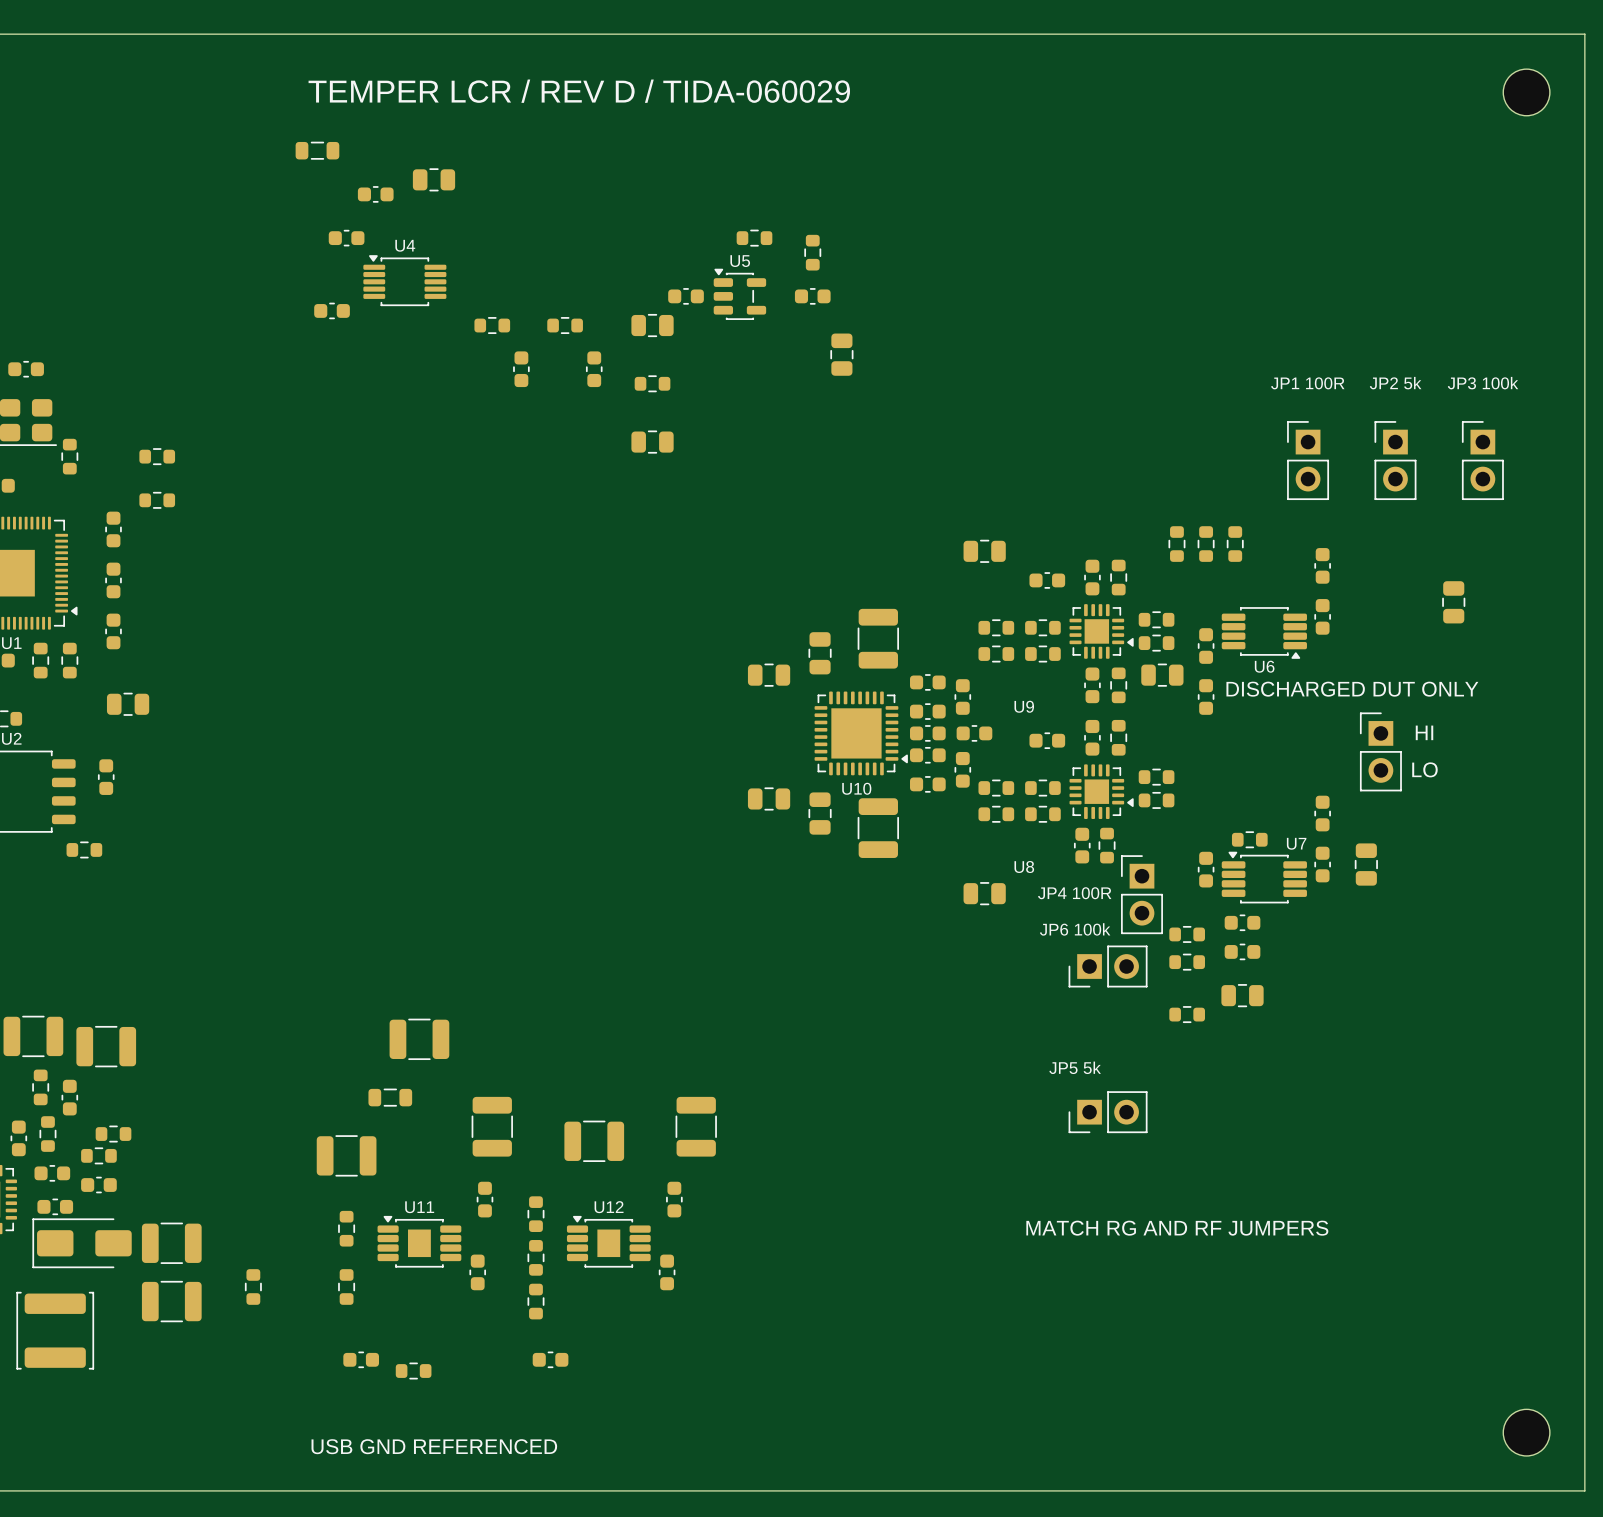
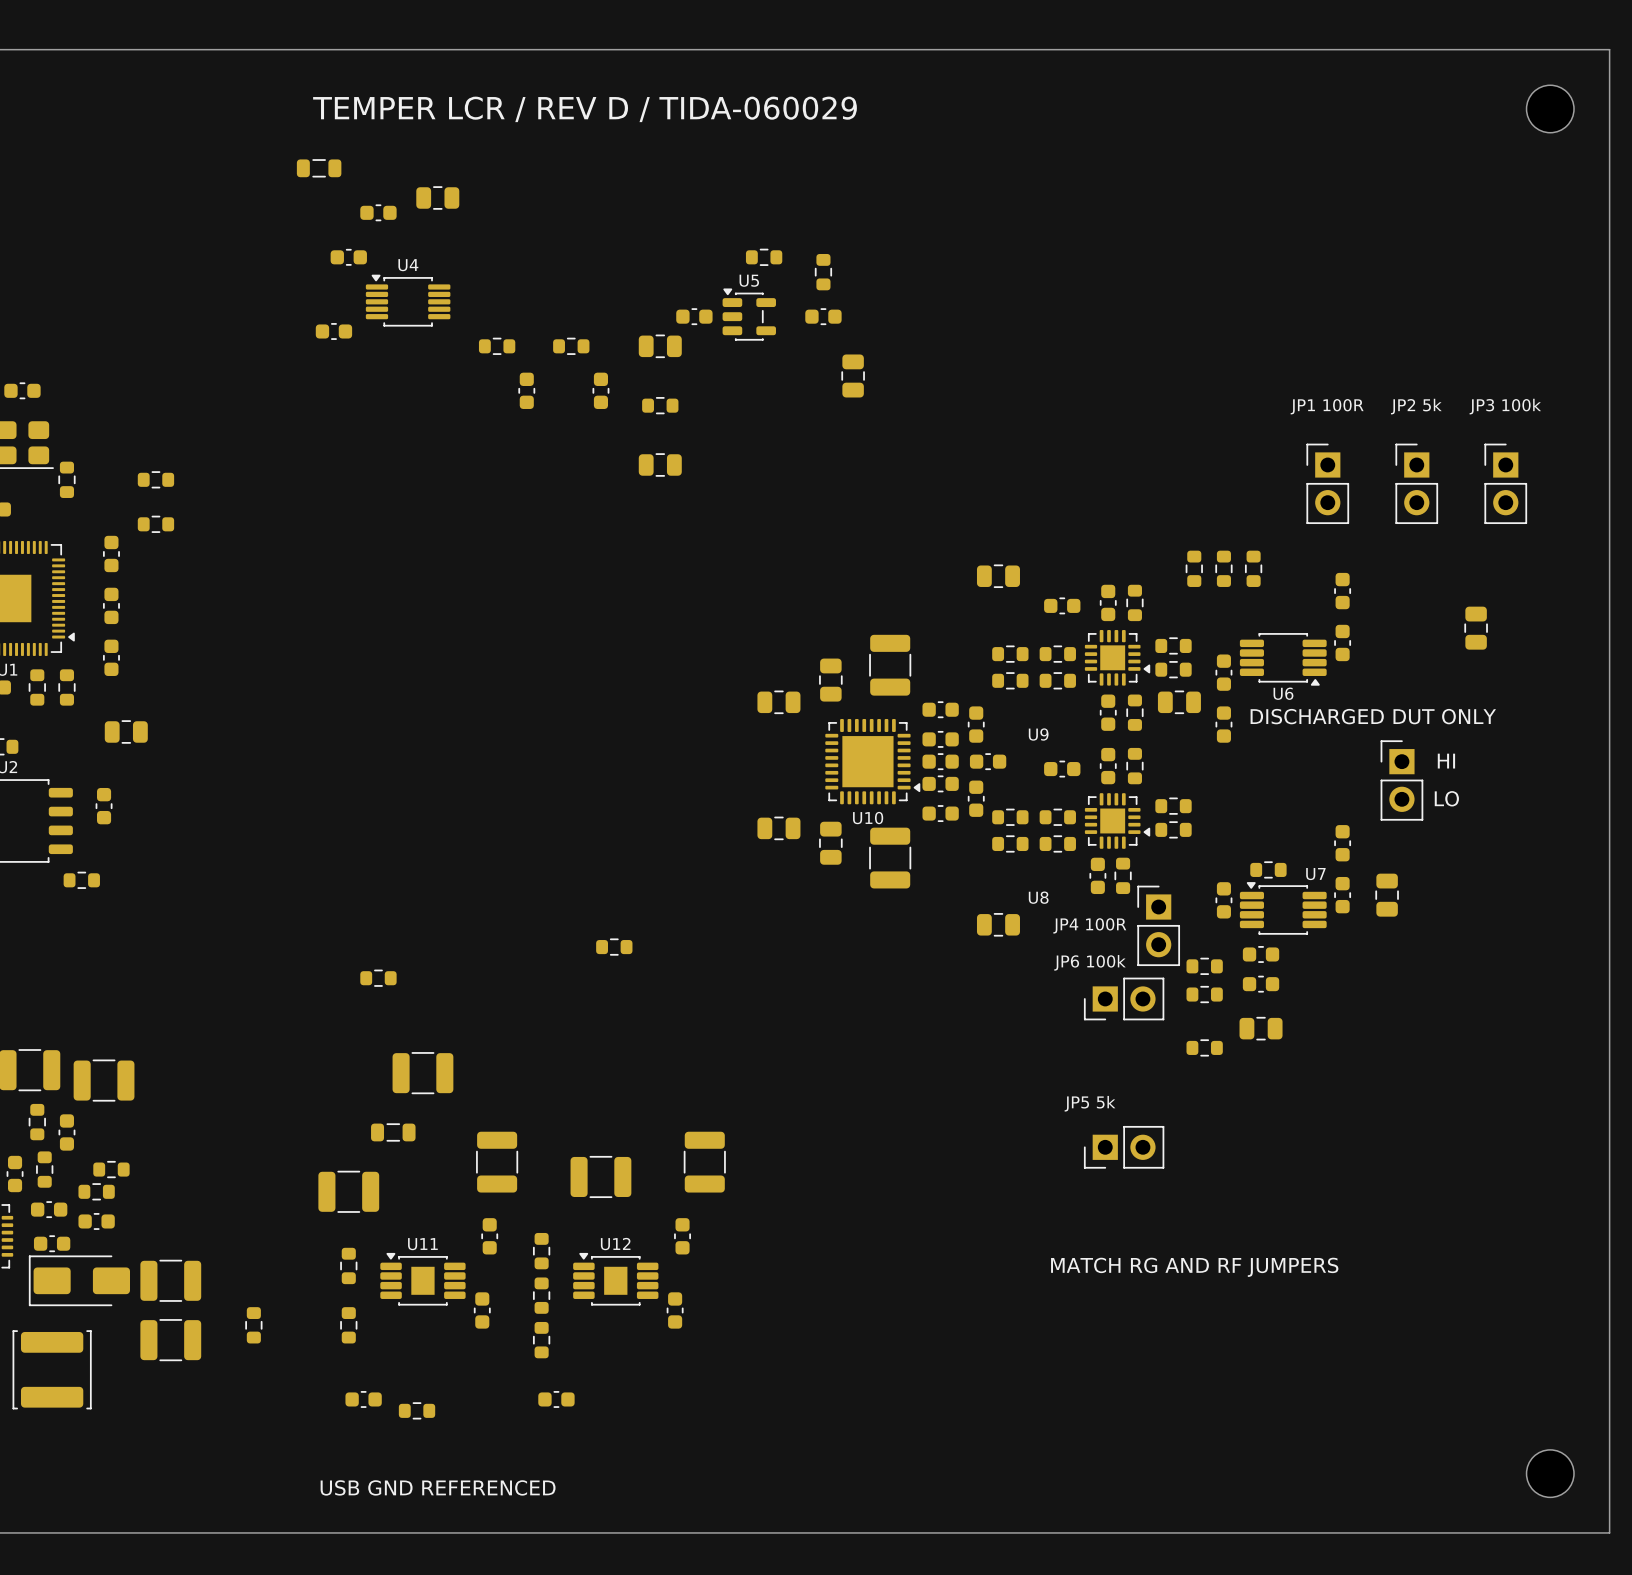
part: none -> (614, 947)
part: none -> (378, 978)

